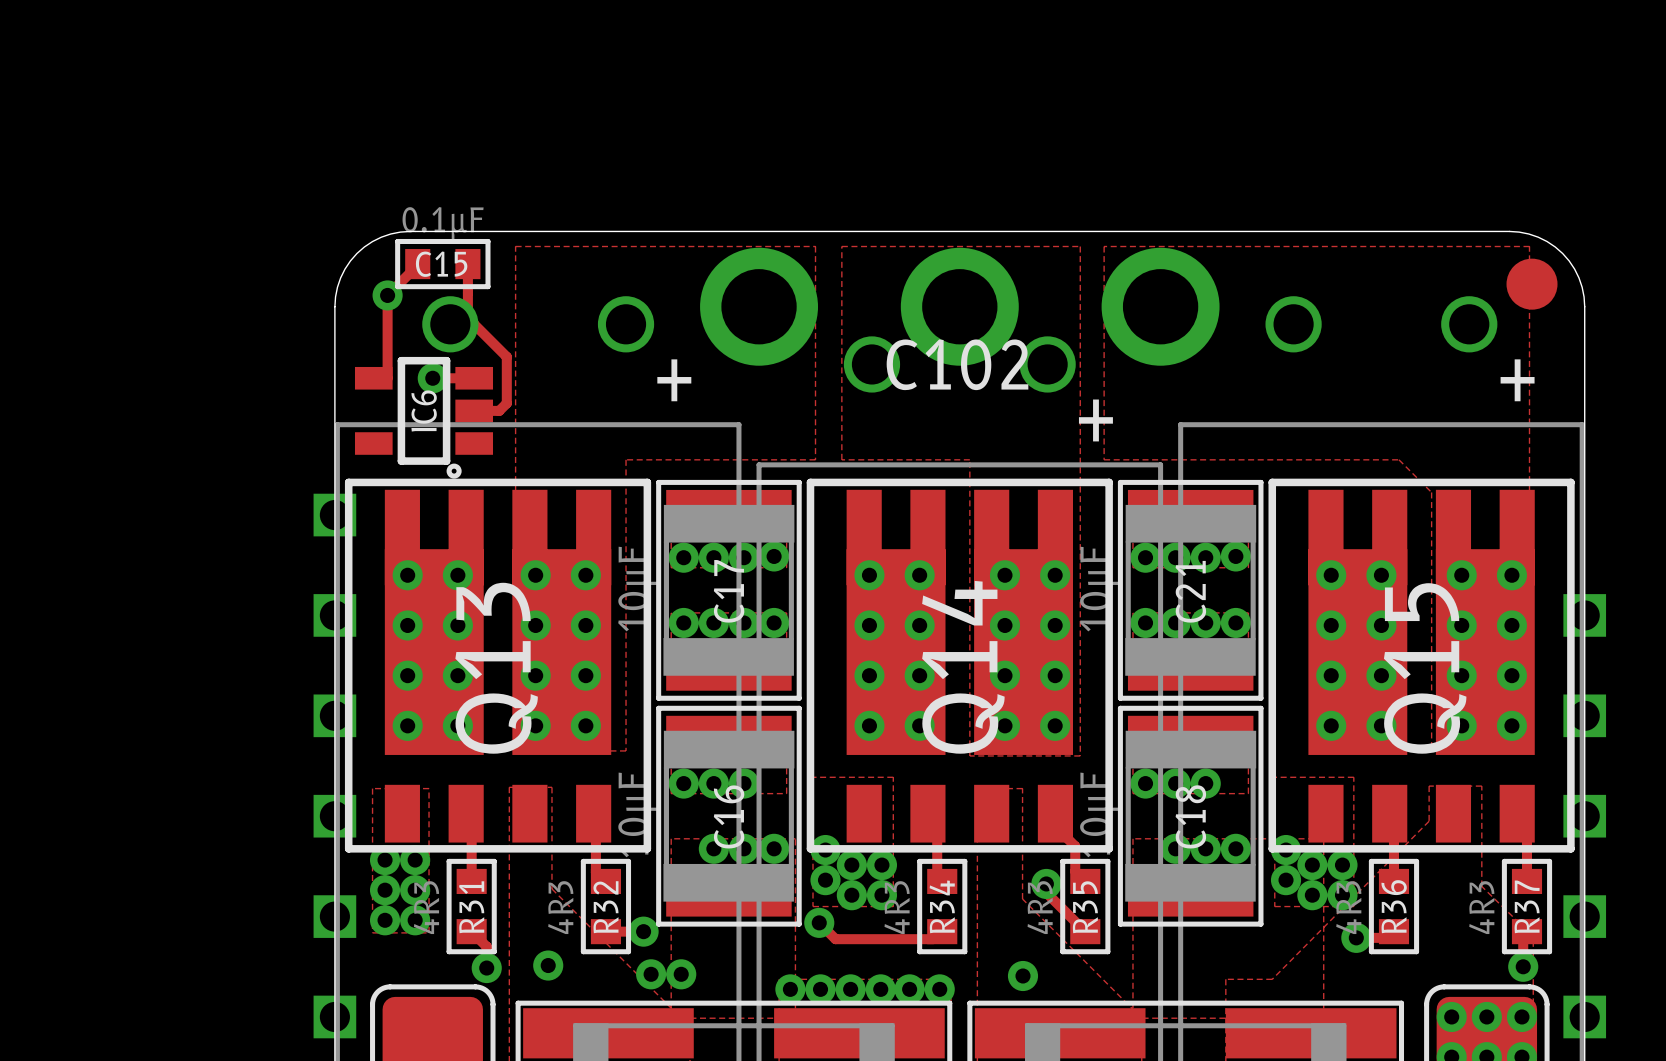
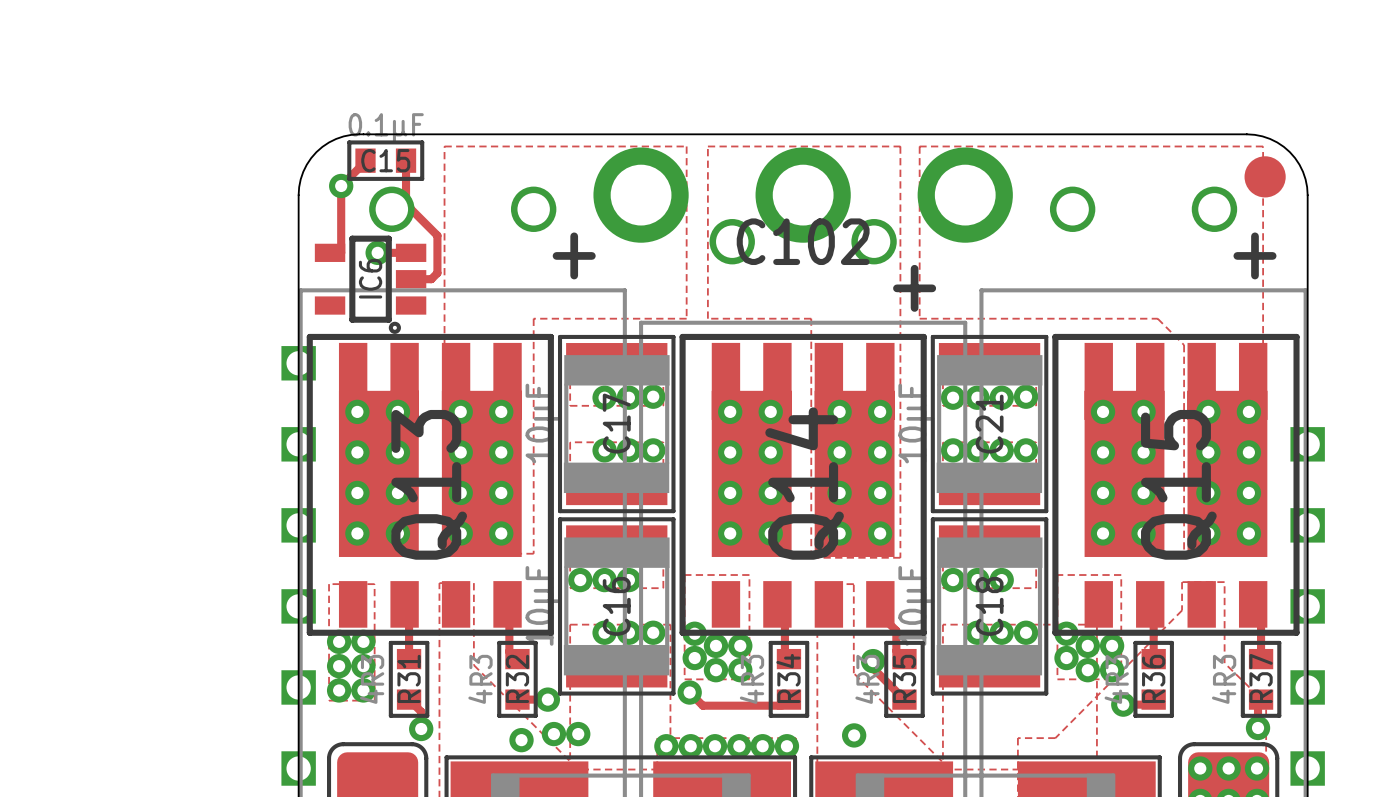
via: (683, 557) -> none
via: (683, 622) -> none
via position: (548, 965) -> (521, 740)

